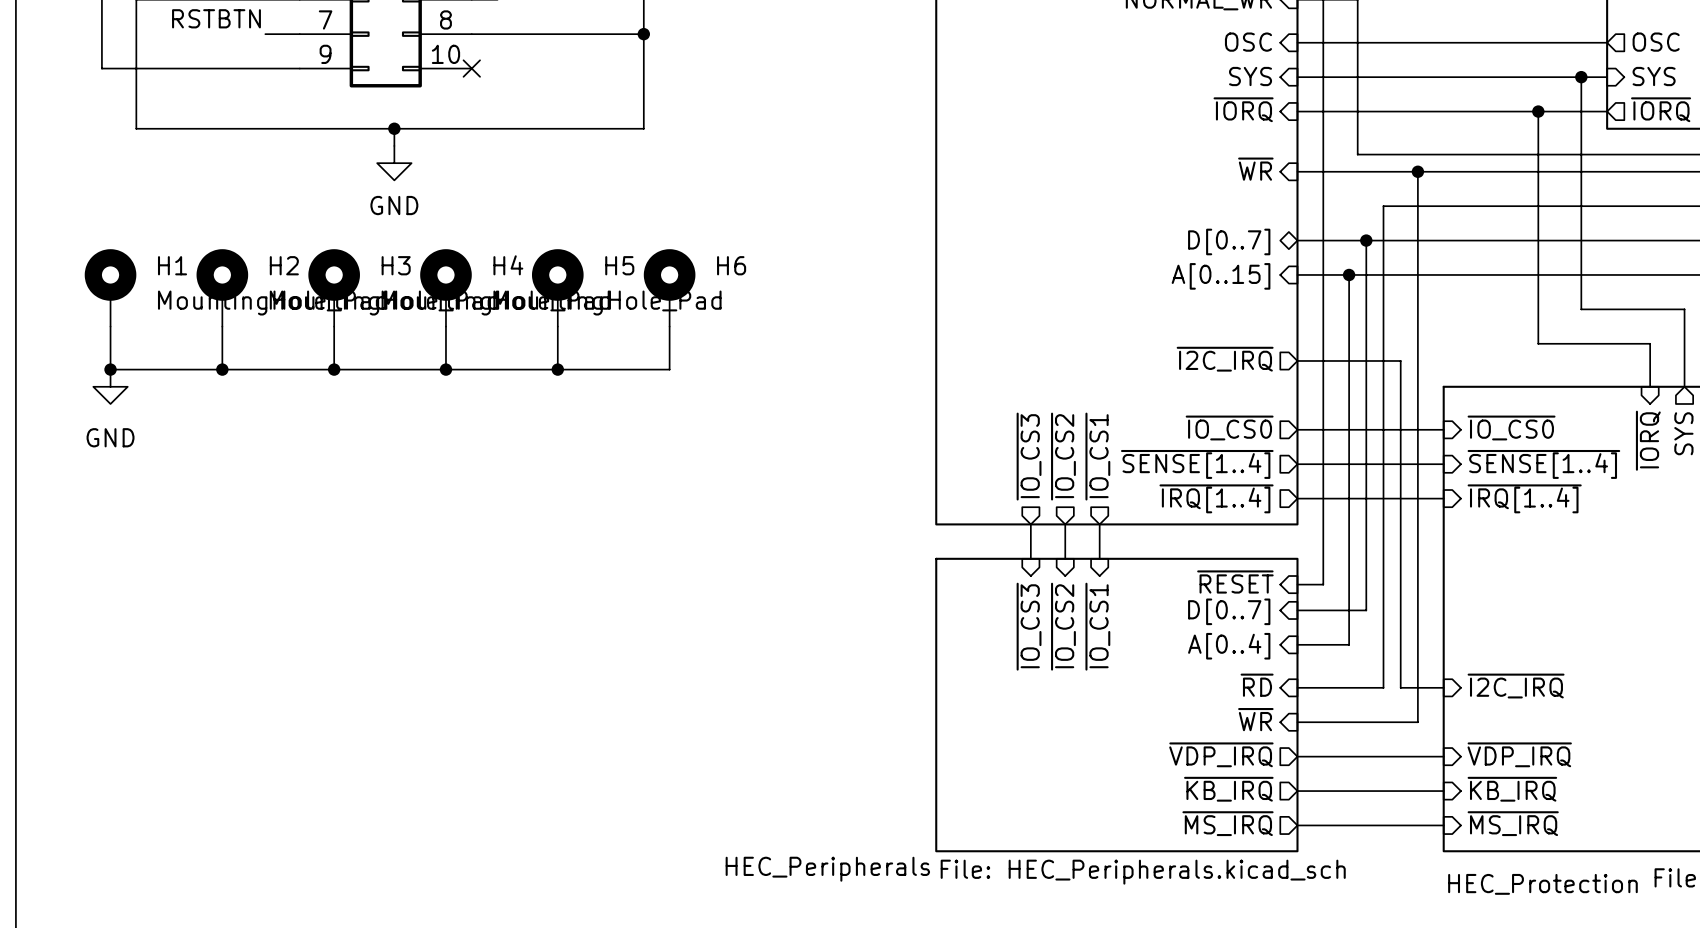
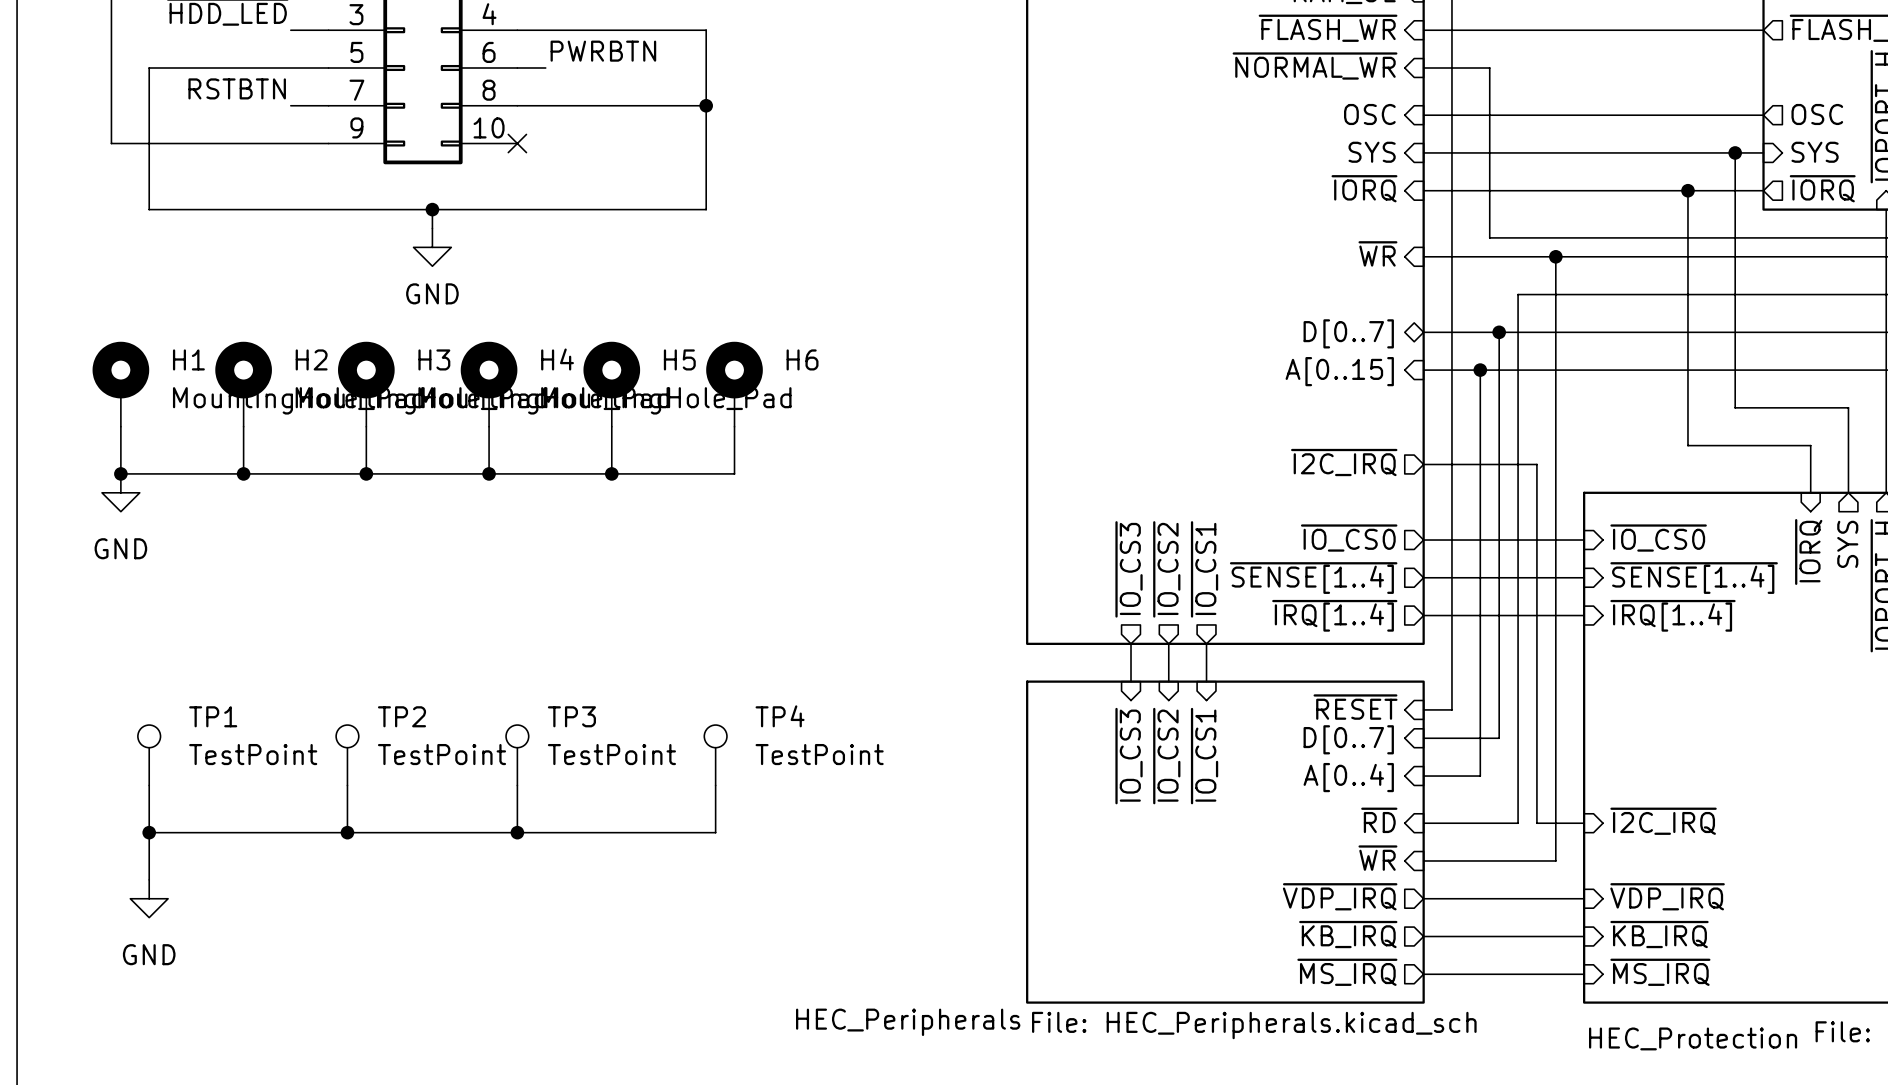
TP1: none -> TestPoint (149, 755)
TP2: none -> TestPoint (347, 755)
TP3: none -> TestPoint (517, 755)
TP4: none -> TestPoint (715, 755)
wire: none -> (149, 785) (149, 879)
wire: none -> (347, 785) (347, 832)
wire: none -> (517, 785) (517, 832)
wire: none -> (715, 785) (715, 832) (149, 832)
junction: none -> (149, 832)
junction: none -> (347, 832)
junction: none -> (517, 832)
power symbol: none -> GND (149, 898)

